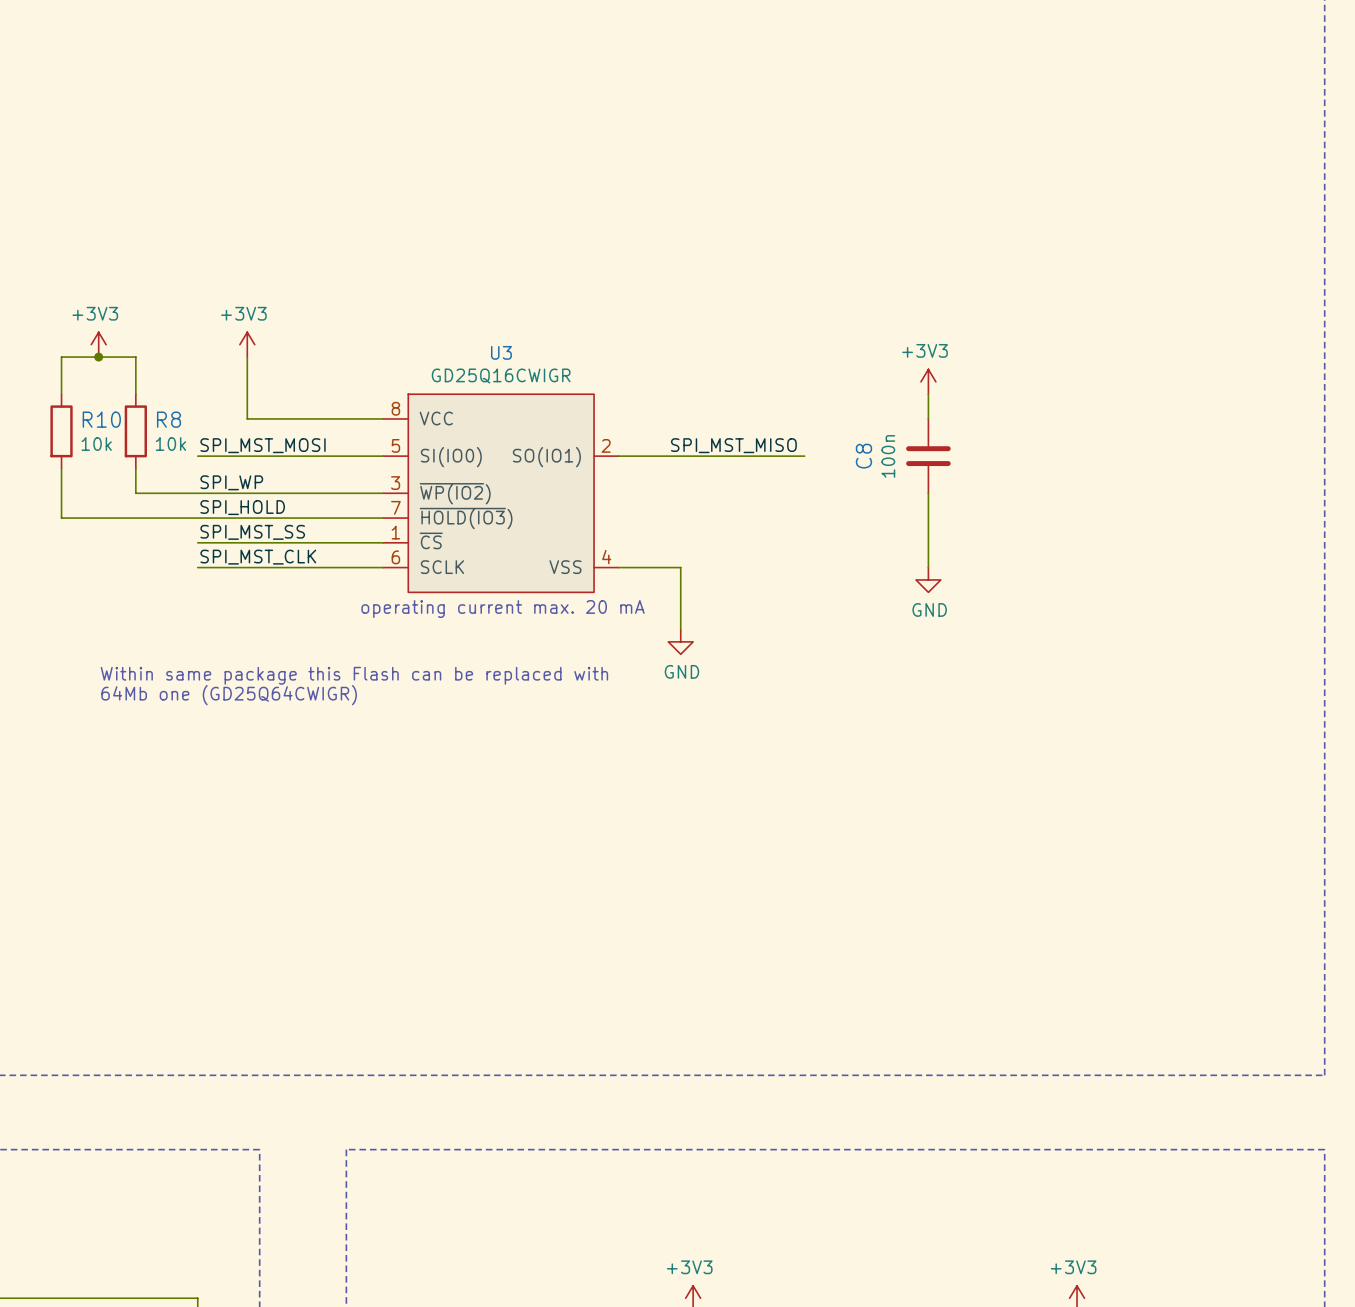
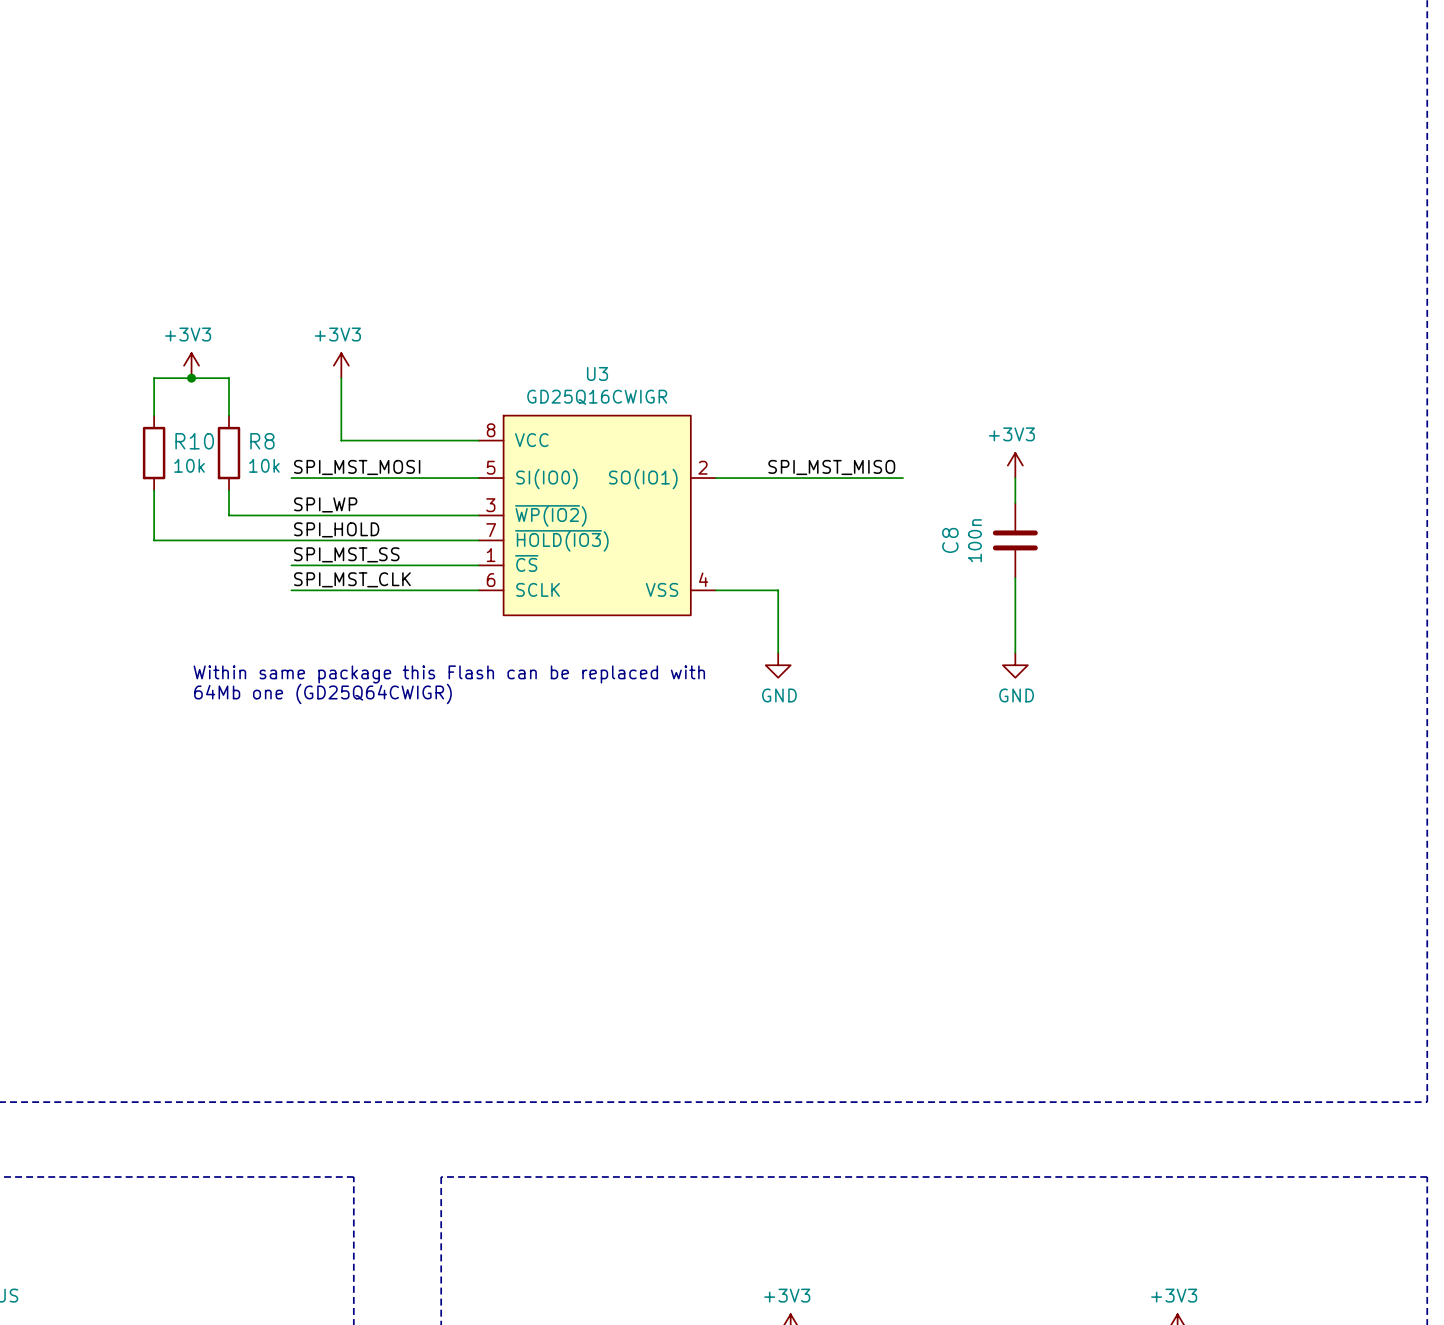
power symbol position: +3V3 (928, 381) -> +3V3 (1015, 465)
wire: (928, 394) (928, 418) -> (1015, 478) (1015, 502)
C8 position: (928, 456) -> (1015, 540)
wire: (928, 493) (928, 567) -> (1015, 577) (1015, 652)
power symbol position: GND (928, 579) -> GND (1015, 665)
text: operating current max. 20 mA (503, 609) -> none
text: none -> Within same package this Flash can be replaced with (449, 674)
text: Within same package this Flash can be replaced with (354, 675) -> 64Mb one (GD25Q64CWIGR) (323, 693)
text: 64Mb one (GD25Q64CWIGR) (229, 695) -> none

